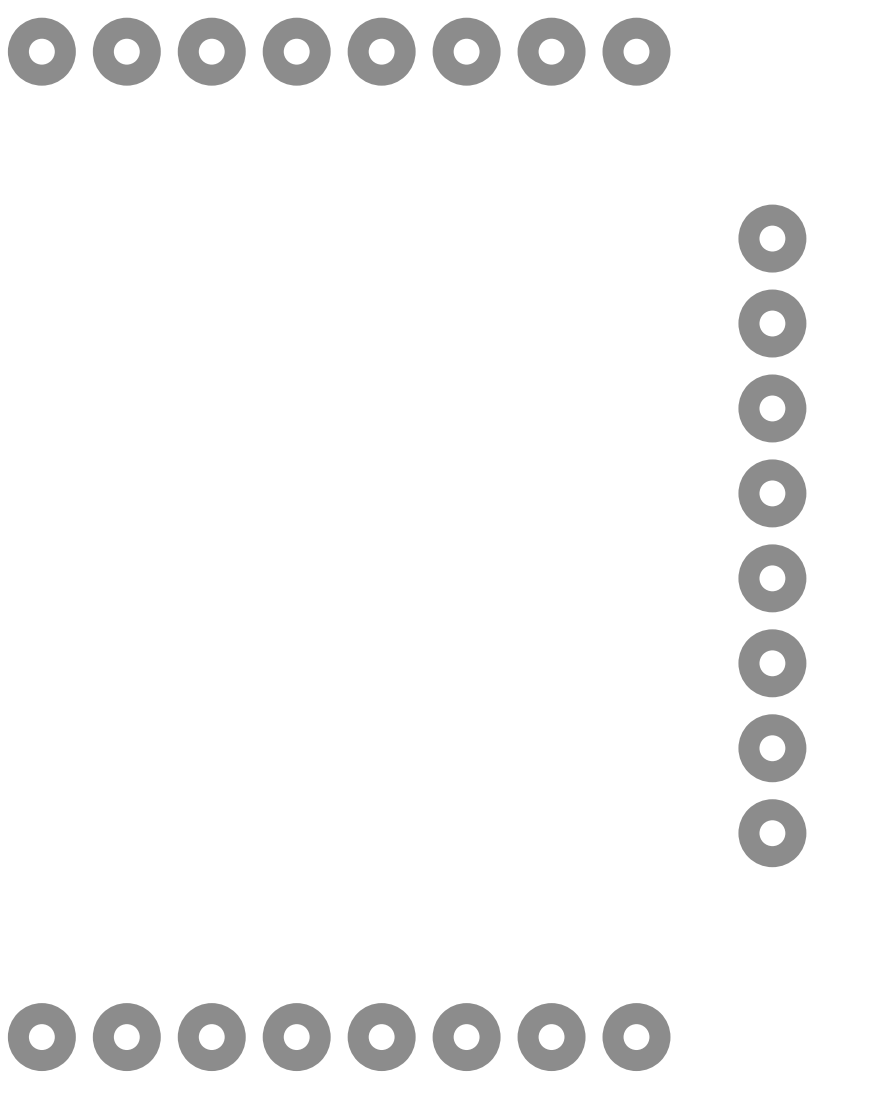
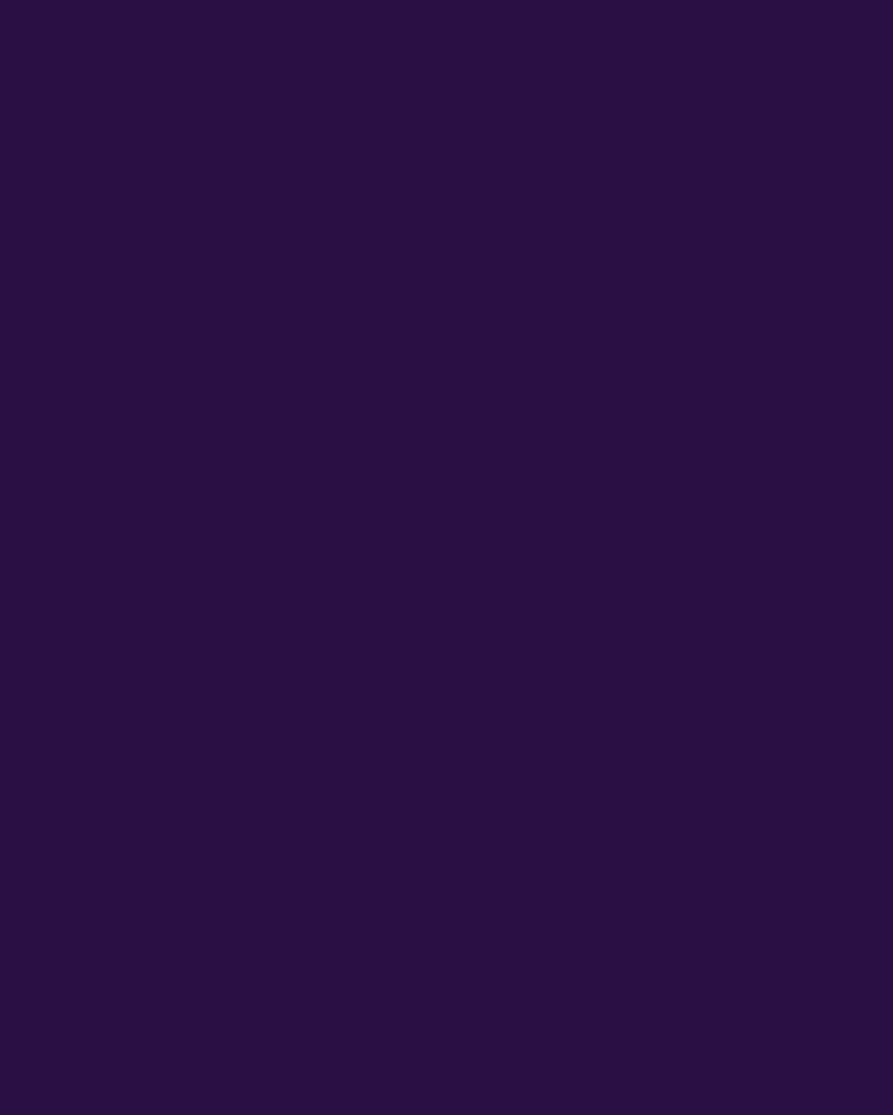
part: (339, 51) -> none
part: (772, 535) -> none
part: (339, 1037) -> none

